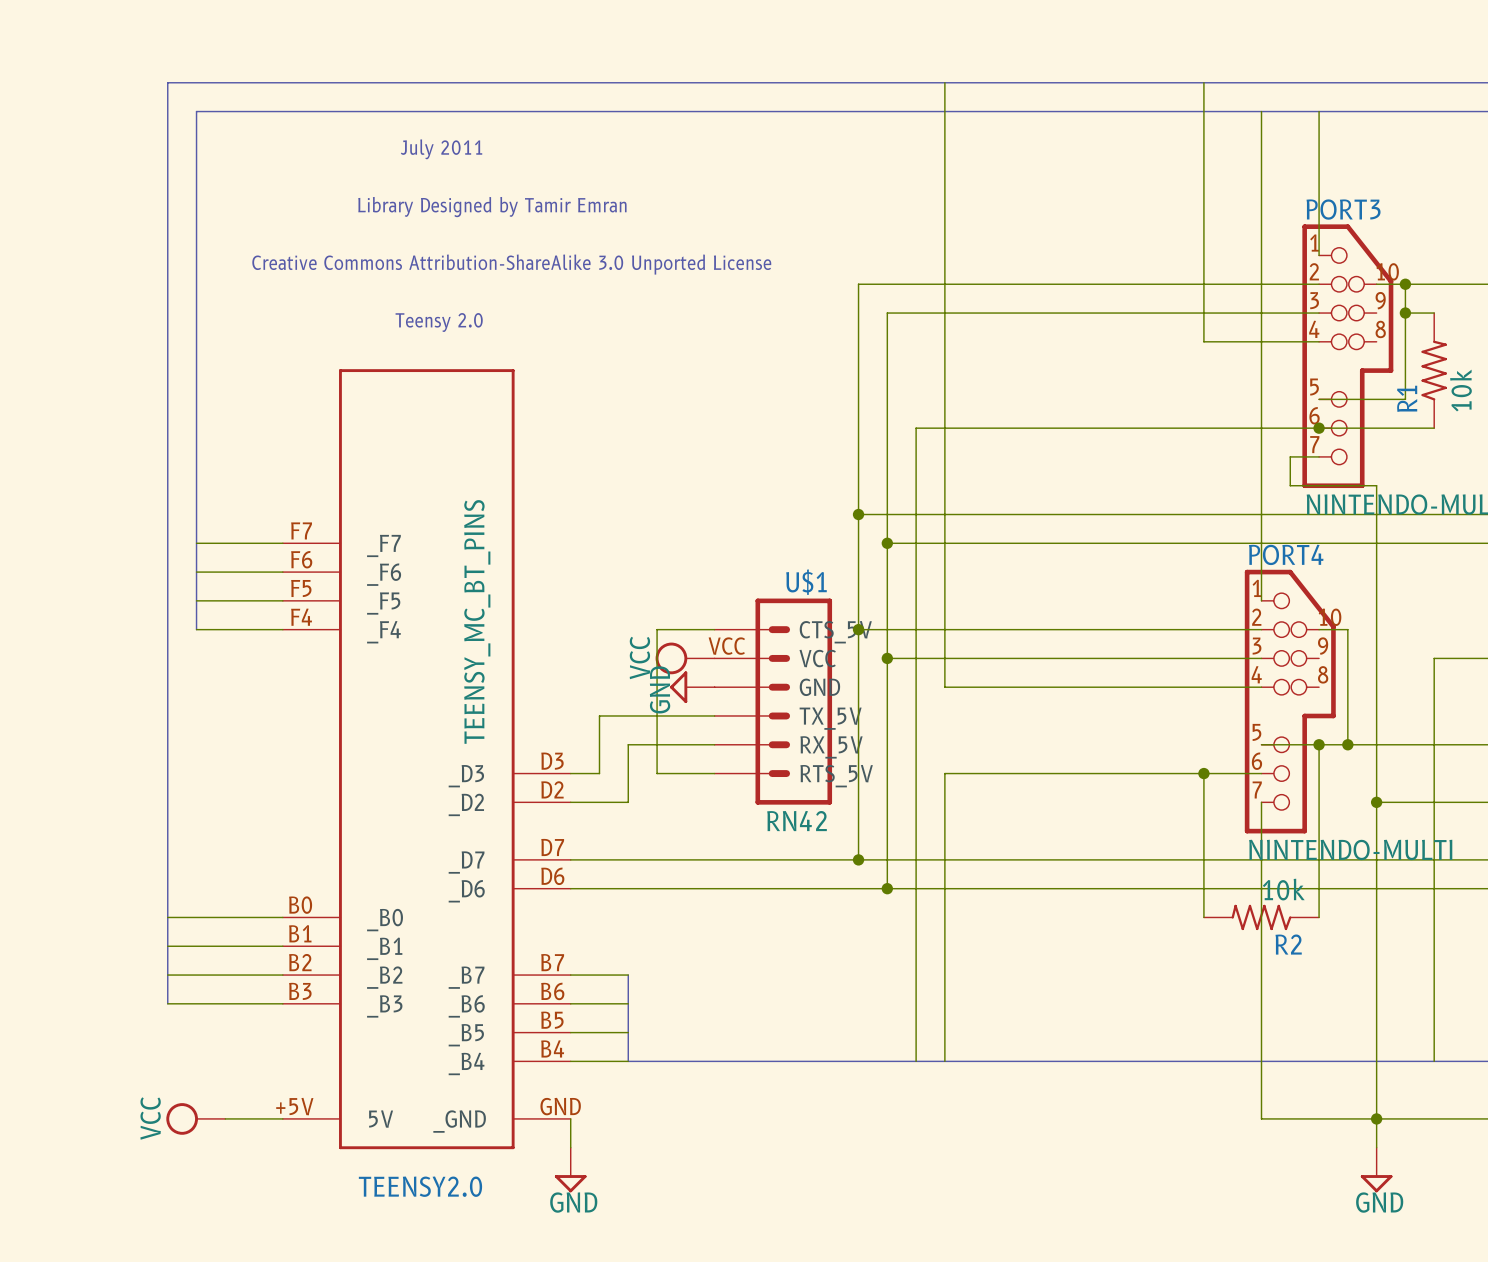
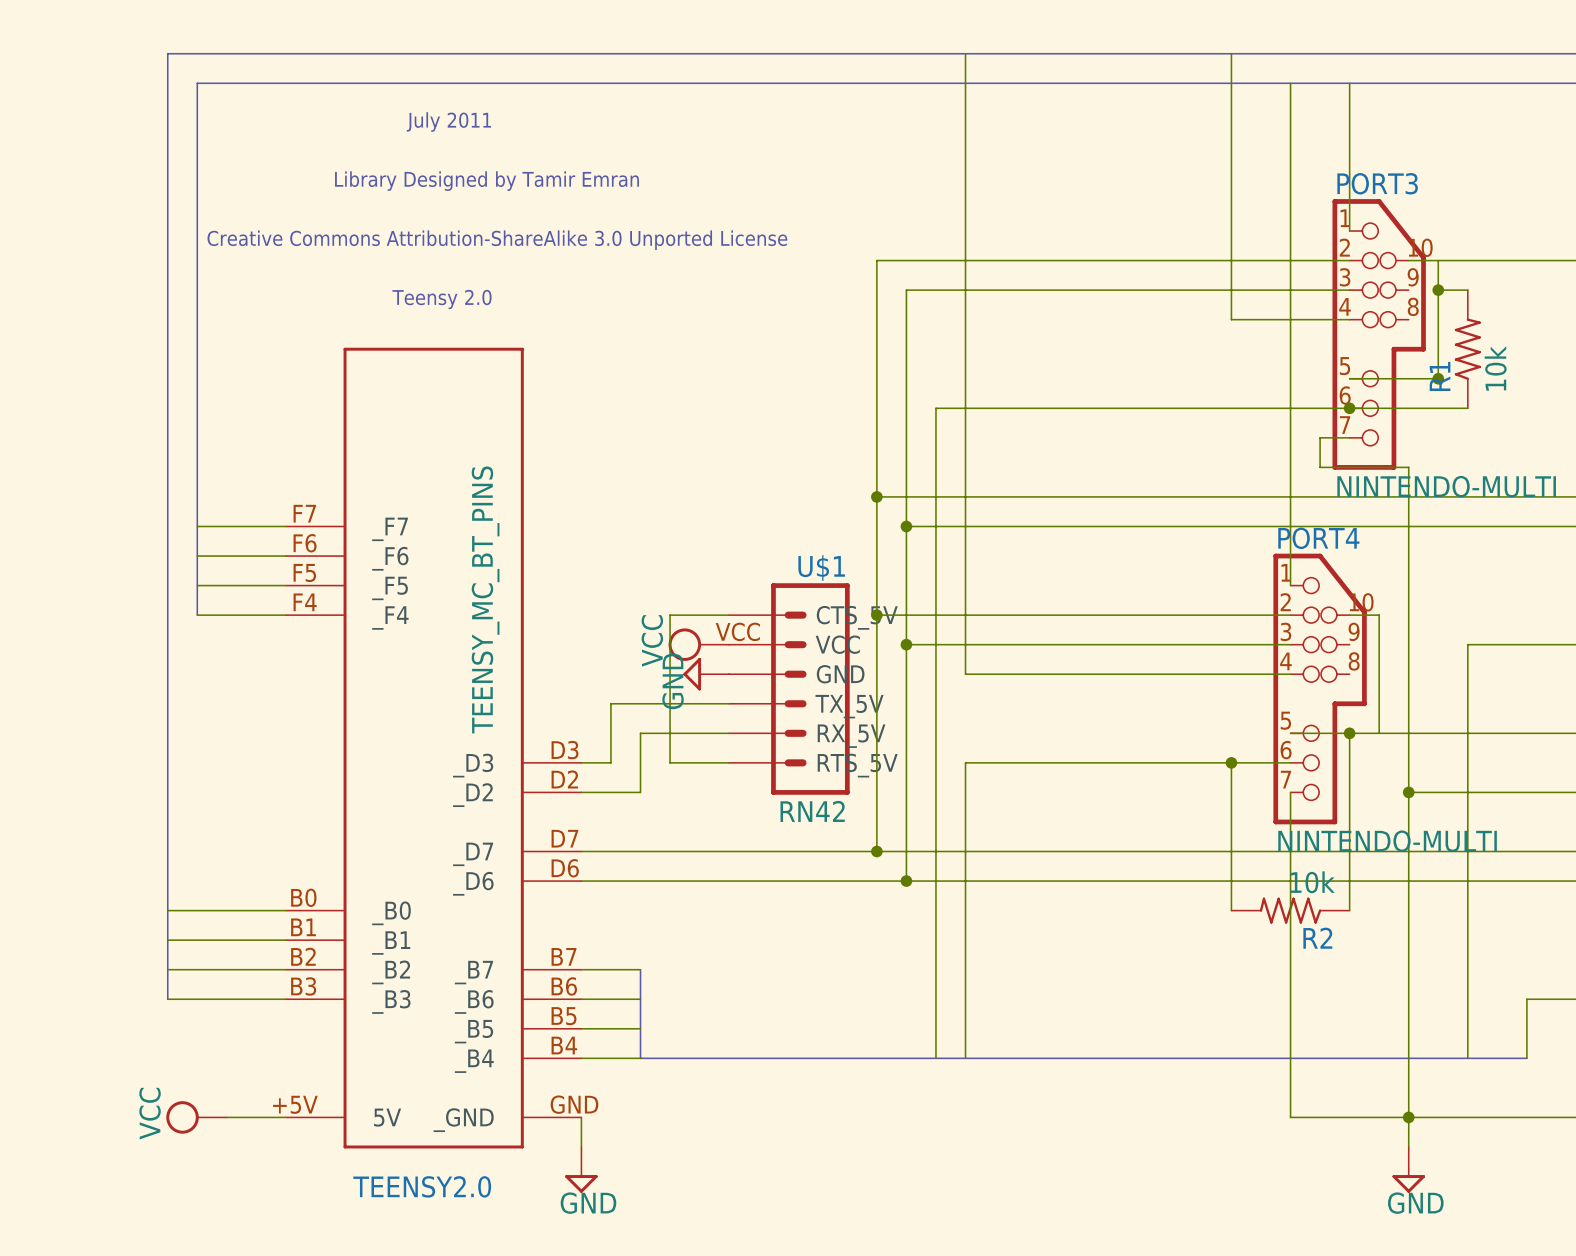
junction: (1405, 284) -> none
junction: none -> (1438, 378)
junction: (1347, 744) -> none

